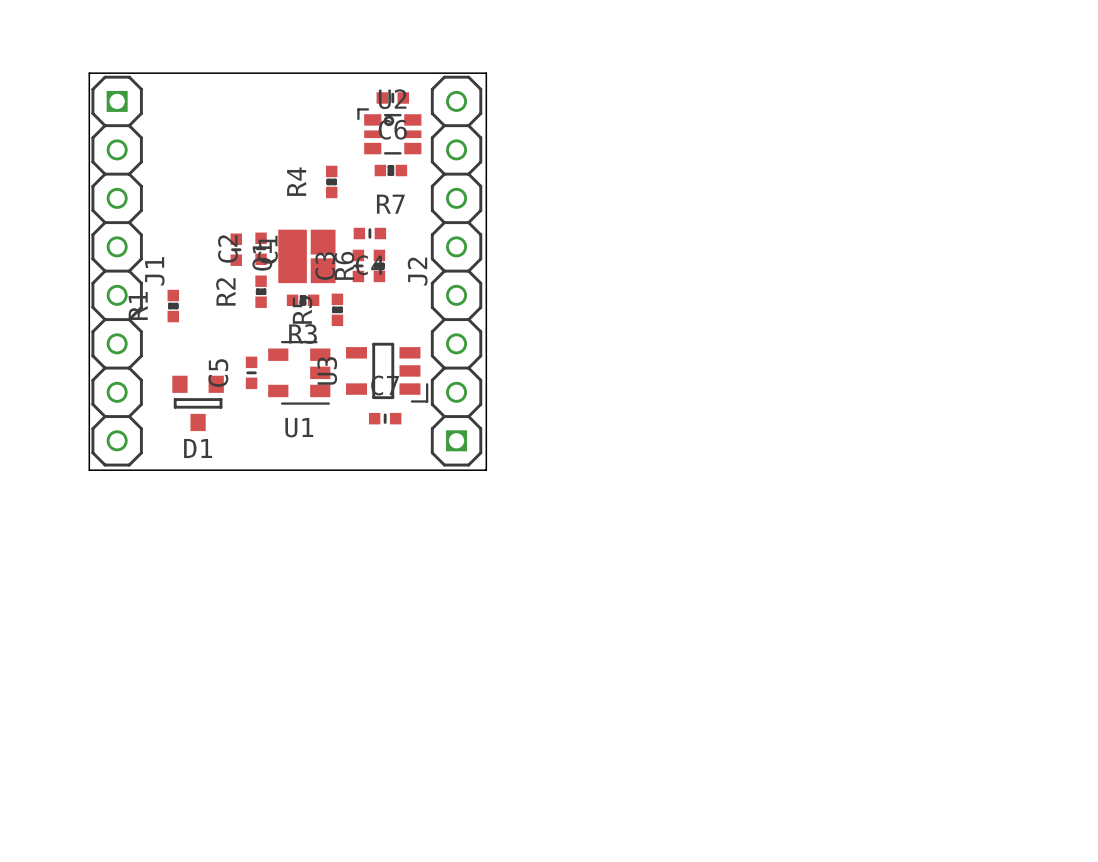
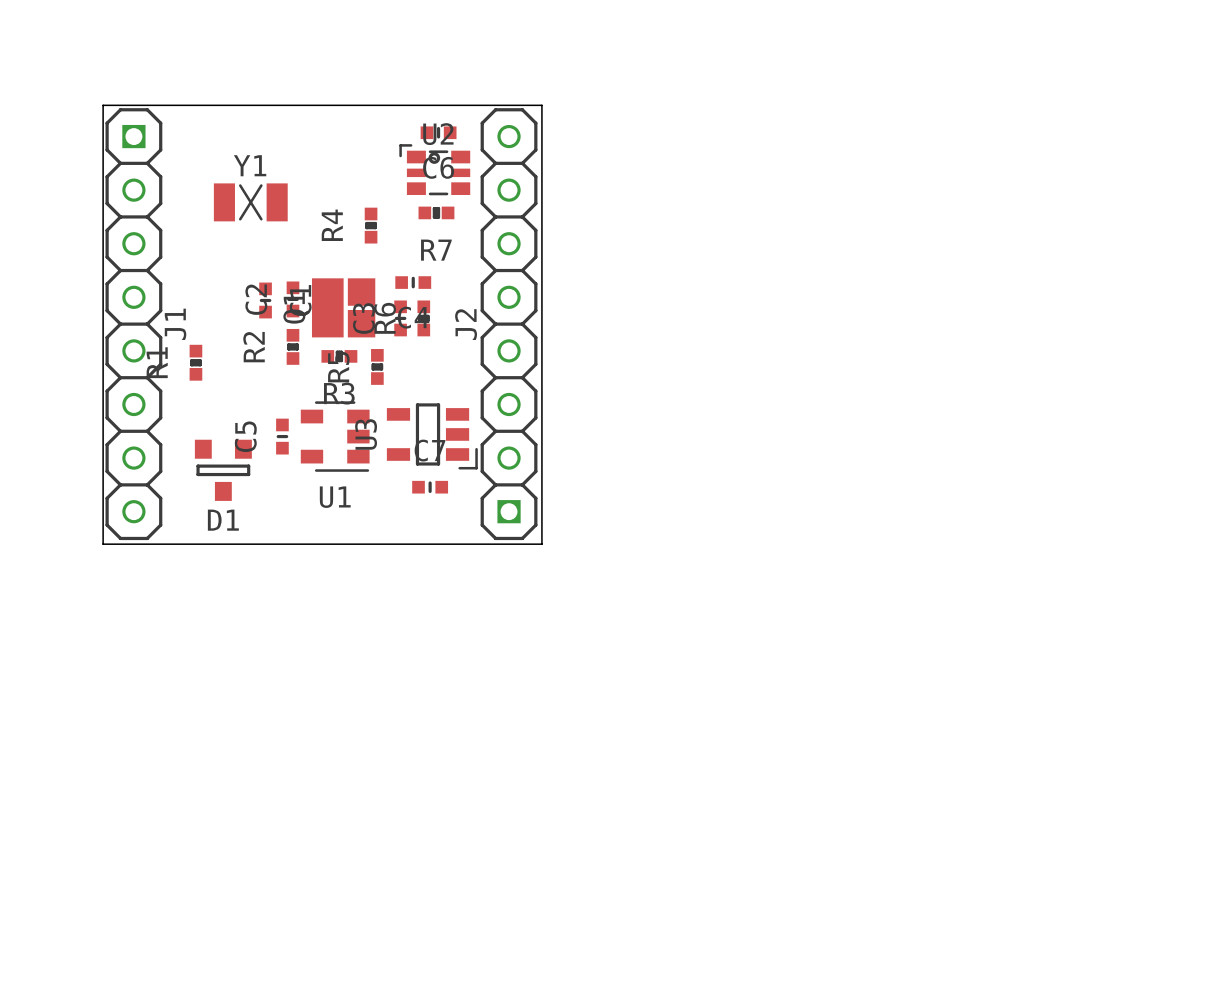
Y1: none -> (250, 202)

